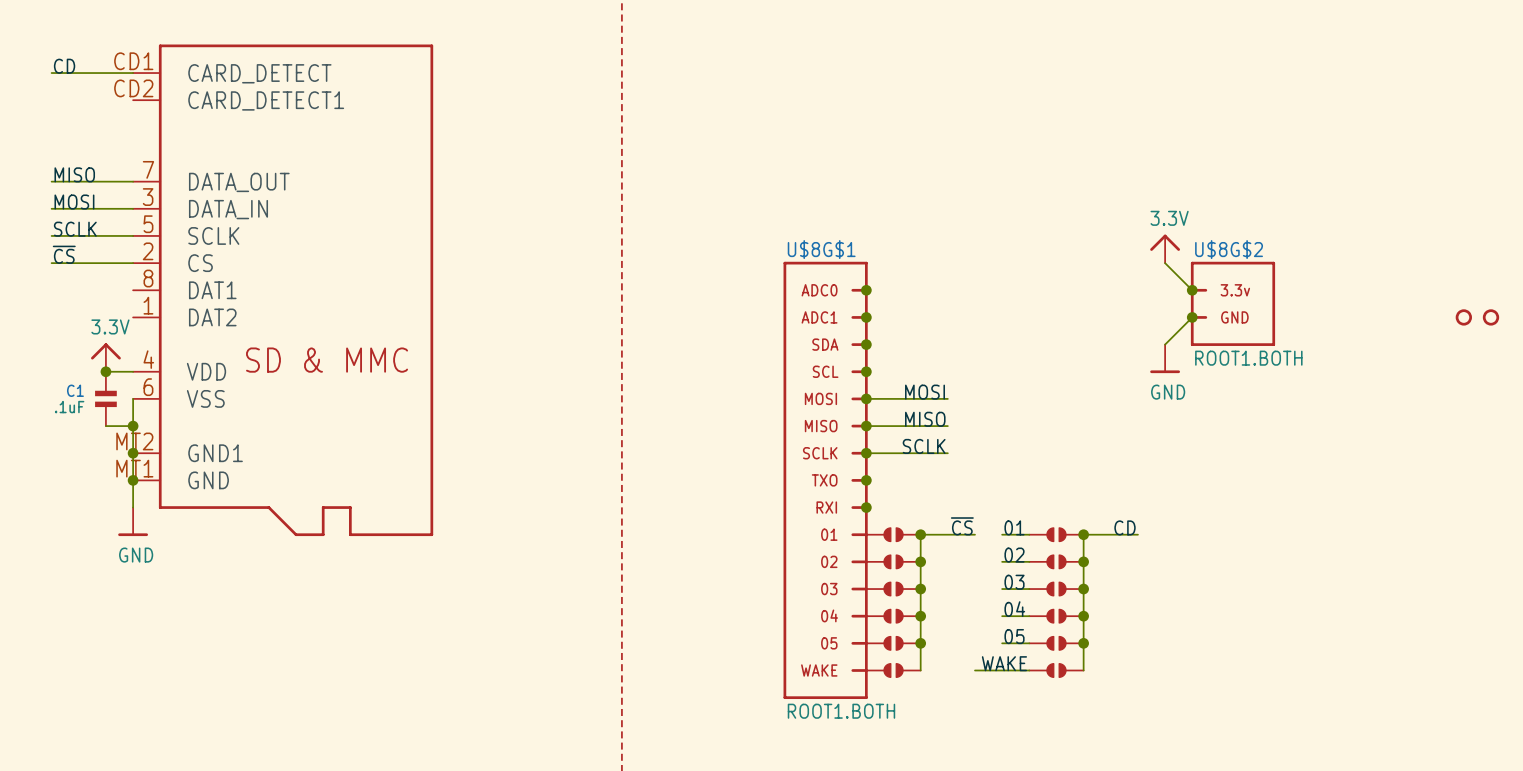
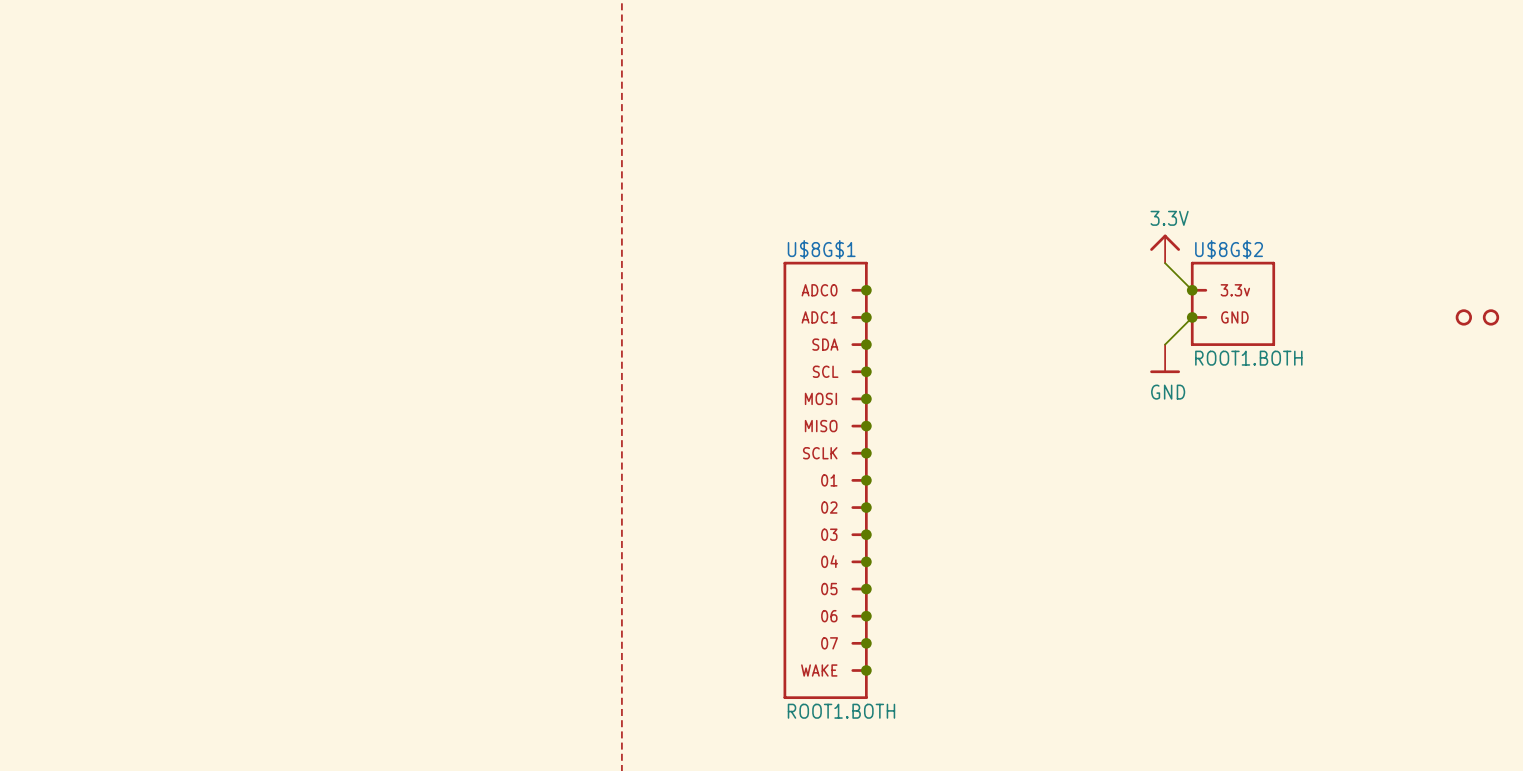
label: CD (64, 66) -> none
wire: (51, 73) (133, 73) -> none
label: MISO (74, 174) -> none
wire: (51, 181) (133, 181) -> none
label: MOSI (74, 202) -> none
wire: (51, 208) (133, 208) -> none
label: SCLK (75, 229) -> none
wire: (51, 235) (133, 235) -> none
label: ~{CS} (64, 254) -> none
wire: (51, 263) (133, 263) -> none
part: (283, 290) -> none
power symbol: 3.3V (105, 357) -> none
wire: (105, 371) (133, 371) -> none
junction: (105, 371) -> none
label: MOSI (925, 392) -> none
C1: .1uF (105, 398) -> none
wire: (133, 398) (133, 507) -> none
wire: (866, 398) (947, 398) -> none
label: MISO (925, 419) -> none
wire: (105, 426) (133, 426) -> none
junction: (133, 426) -> none
wire: (866, 426) (947, 426) -> none
label: SCLK (924, 446) -> none
junction: (133, 453) -> none
wire: (866, 453) (947, 453) -> none
junction: (133, 480) -> none
U$8G$1 text: TXO (824, 480) -> 01 (829, 480)
U$8G$1 text: RXI (826, 507) -> 02 (829, 507)
power symbol: GND (133, 521) -> none
label: ~{CS} (962, 526) -> none
label: 01 (1014, 527) -> none
label: CD (1125, 527) -> none
U$8G$1 text: 01 (829, 534) -> 03 (829, 534)
junction: none -> (866, 534)
part: (893, 534) -> none
junction: (920, 534) -> none
wire: (974, 534) (920, 534) (920, 670) -> none
wire: (1002, 534) (1029, 534) -> none
part: (1056, 534) -> none
junction: (1083, 534) -> none
wire: (1137, 534) (1083, 534) (1083, 670) -> none
label: 02 (1014, 555) -> none
U$8G$1 text: 02 (829, 561) -> 04 (829, 561)
junction: none -> (866, 561)
part: (893, 561) -> none
junction: (920, 561) -> none
wire: (1002, 561) (1029, 561) -> none
part: (1056, 561) -> none
junction: (1083, 561) -> none
label: 03 (1014, 582) -> none
U$8G$1 text: 03 (829, 589) -> 05 (829, 589)
junction: none -> (866, 589)
part: (893, 589) -> none
junction: (920, 589) -> none
wire: (1002, 589) (1029, 589) -> none
part: (1056, 589) -> none
junction: (1083, 589) -> none
label: 04 (1014, 609) -> none
U$8G$1 text: 04 (829, 615) -> 06 (829, 616)
junction: none -> (866, 616)
part: (893, 616) -> none
junction: (920, 616) -> none
wire: (1002, 616) (1029, 616) -> none
part: (1056, 616) -> none
junction: (1083, 616) -> none
label: 05 (1014, 636) -> none
U$8G$1 text: 05 (829, 643) -> 07 (829, 643)
junction: none -> (866, 643)
part: (893, 643) -> none
junction: (920, 643) -> none
wire: (1002, 643) (1029, 643) -> none
part: (1056, 643) -> none
junction: (1083, 643) -> none
label: WAKE (1004, 663) -> none
junction: none -> (866, 670)
part: (893, 670) -> none
wire: (974, 670) (1029, 670) -> none
part: (1056, 670) -> none

